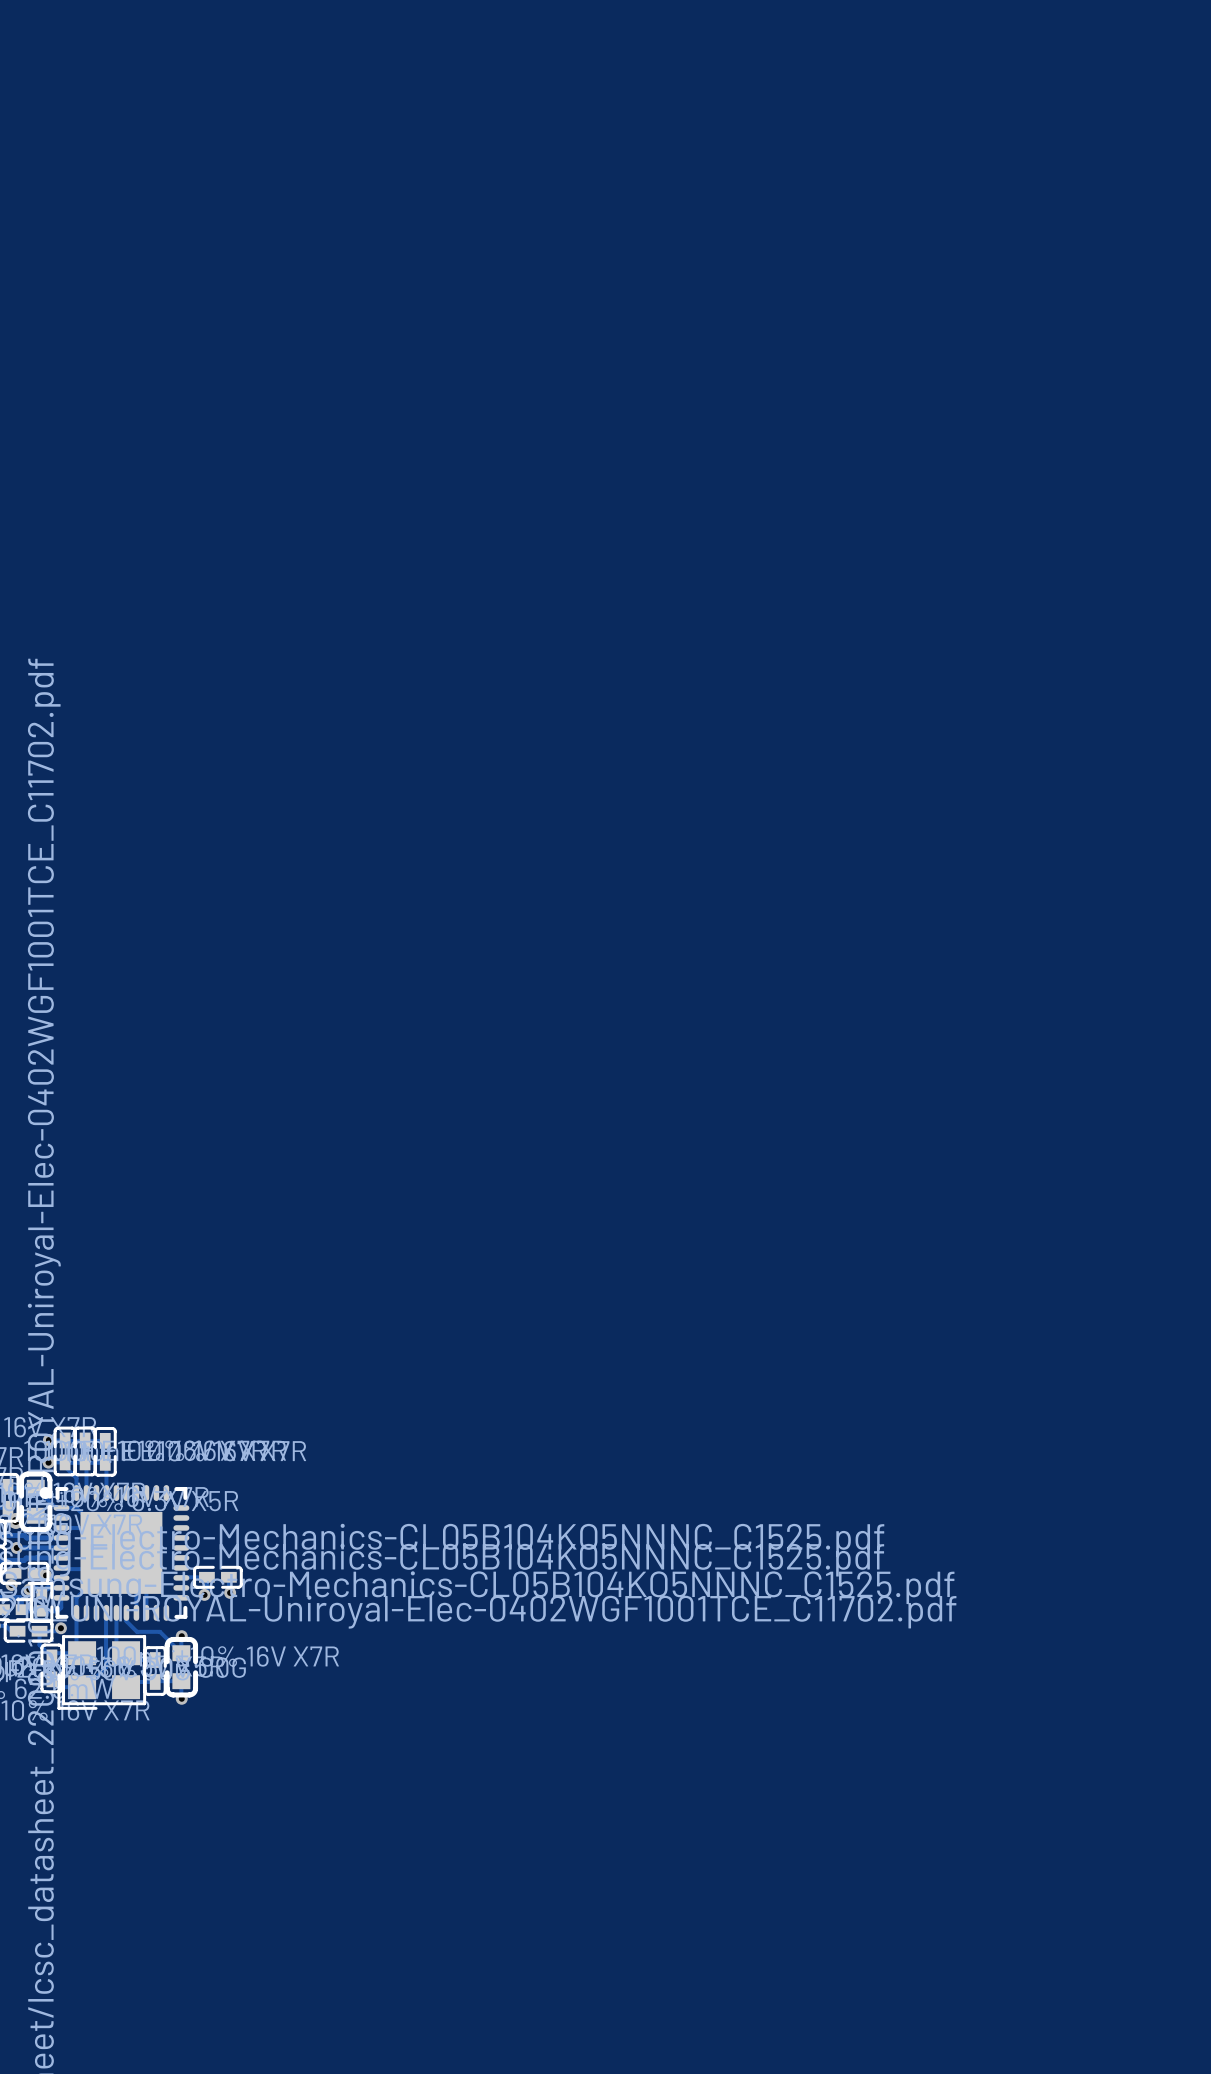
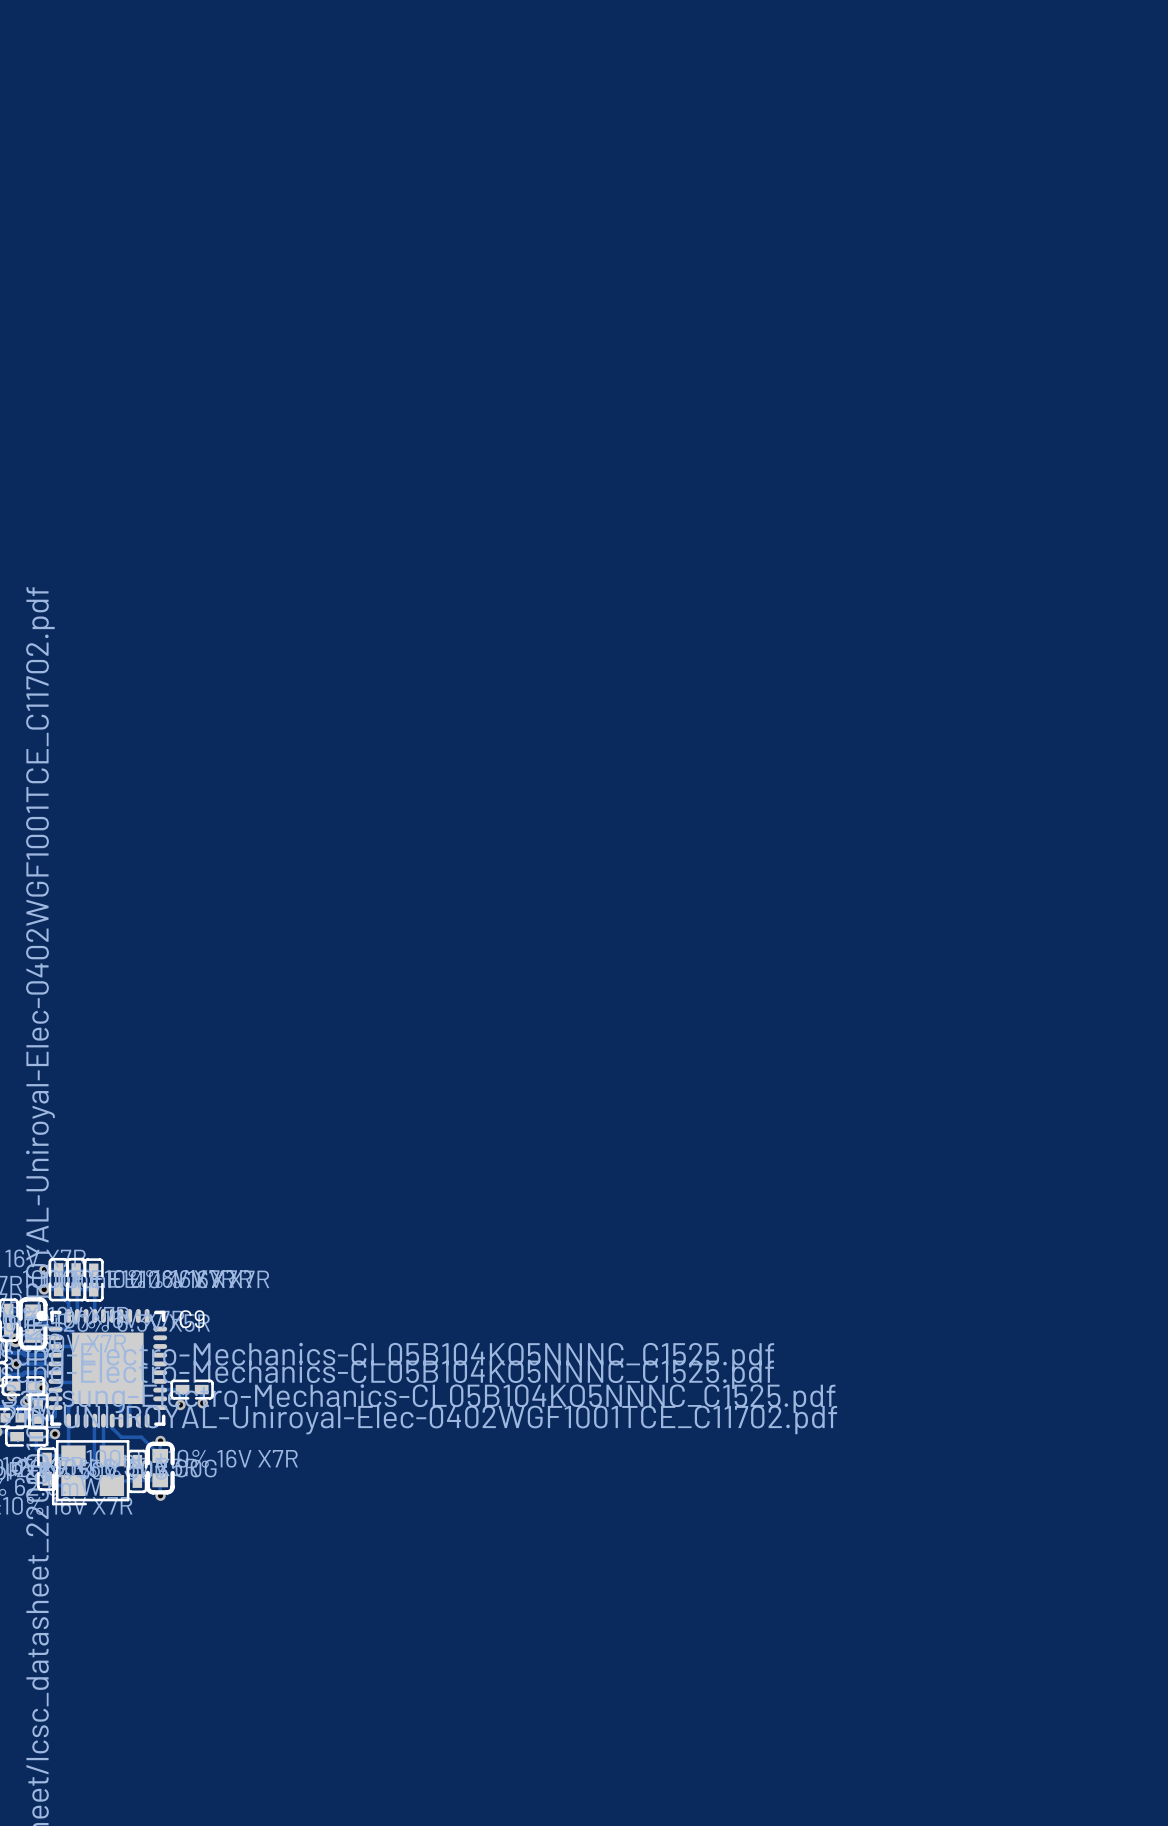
C9 name: none -> C9 (192, 1319)

